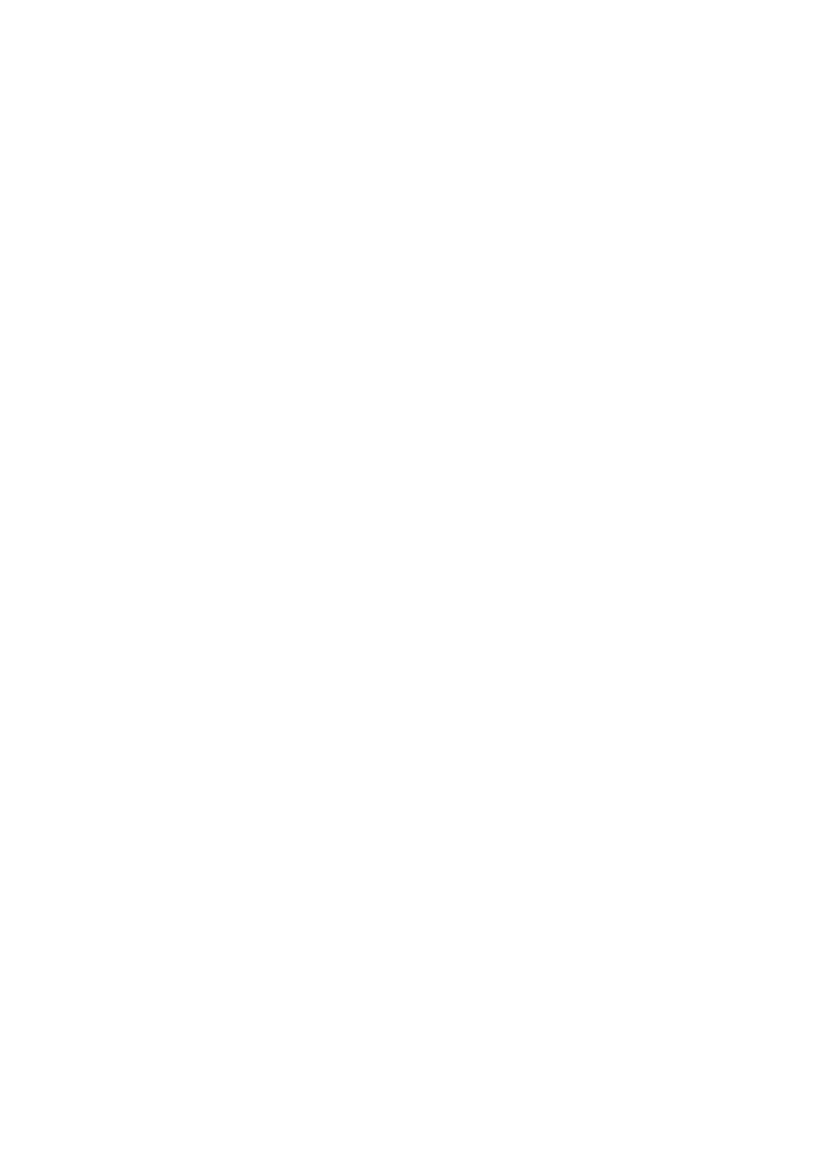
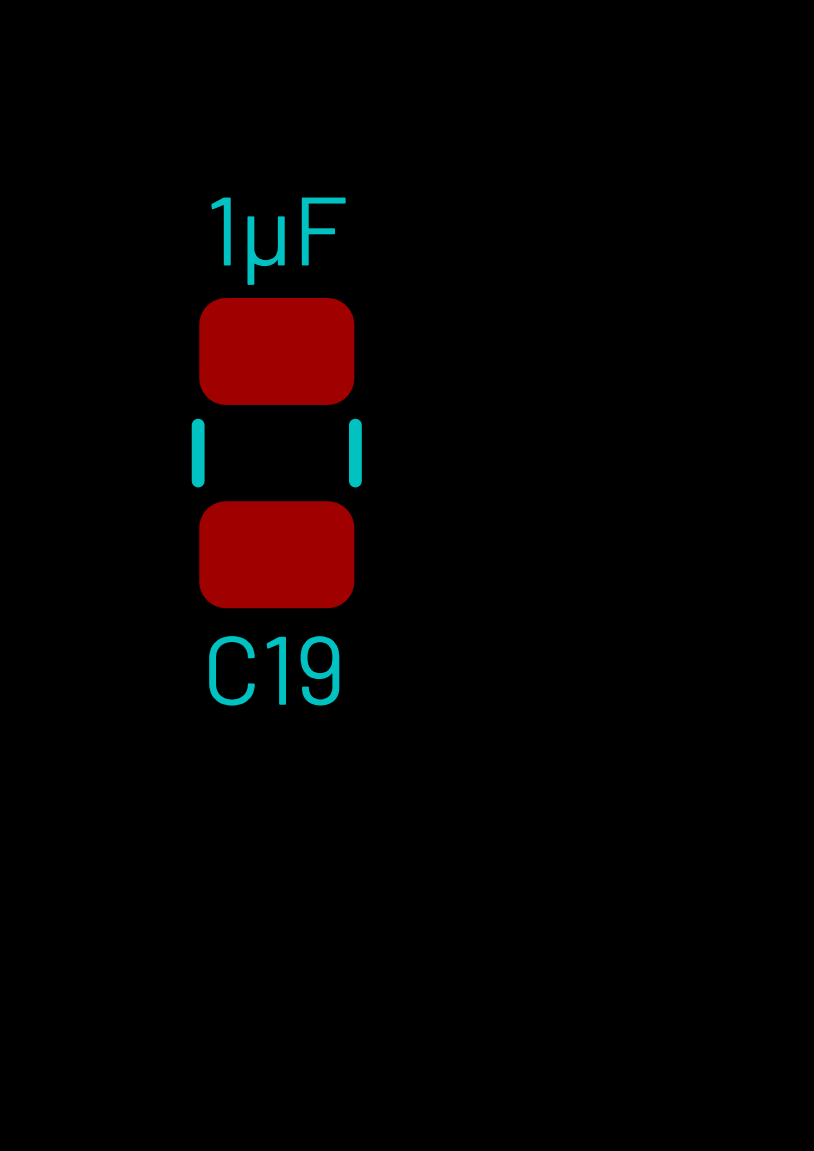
C19: none -> 1μF (276, 453)

